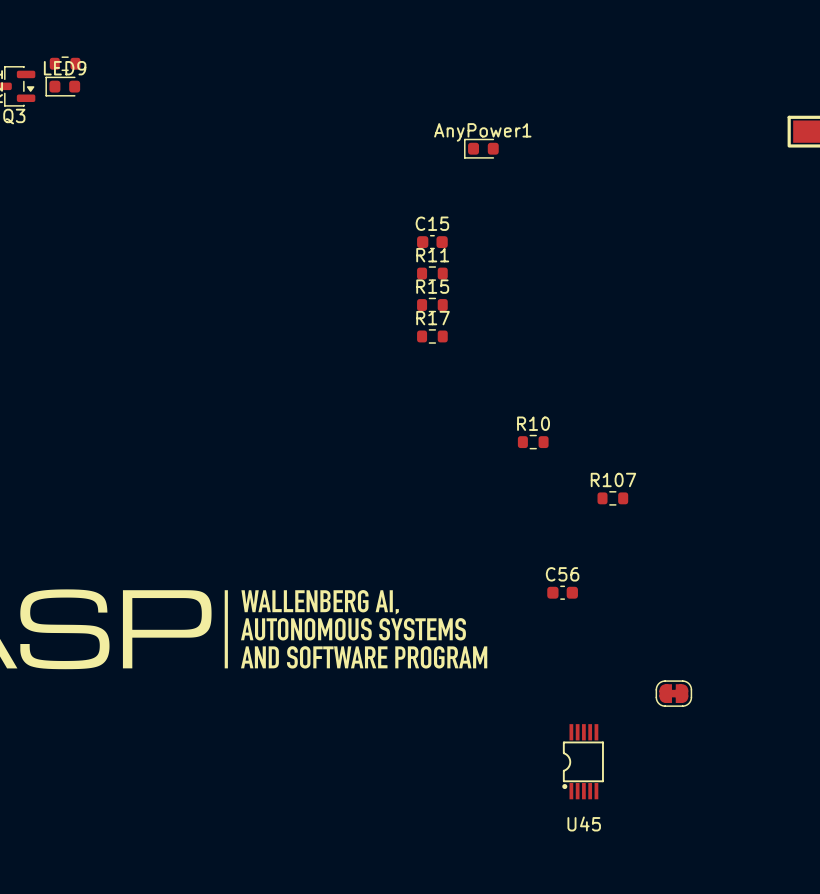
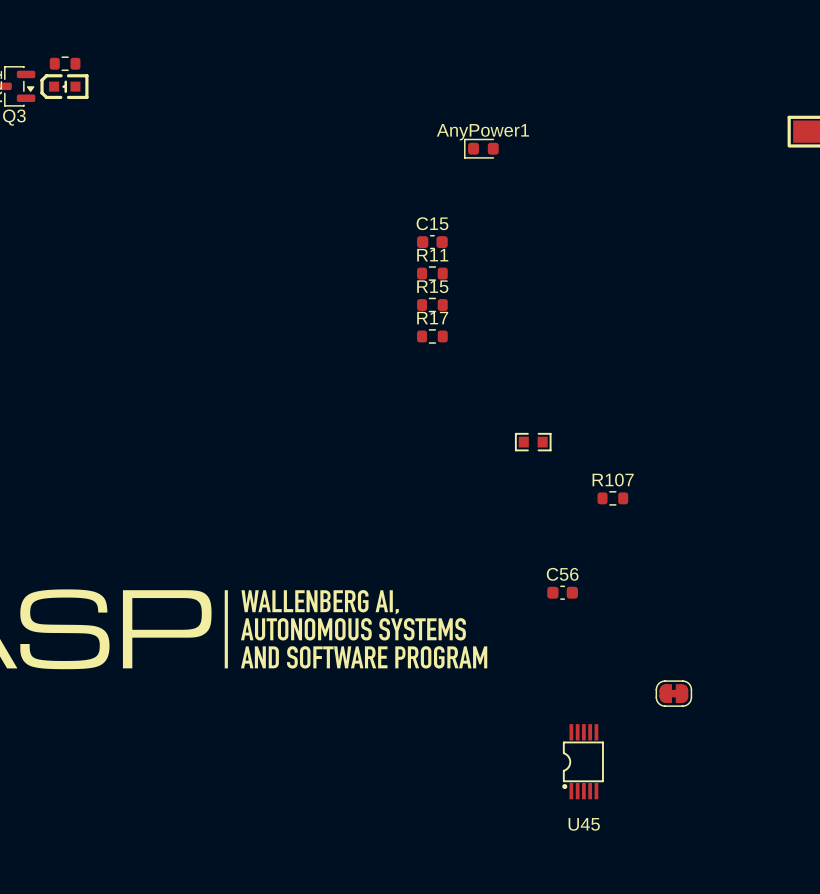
LED9: (62, 86) -> none
part: none -> (64, 86)
R10: (533, 442) -> none
part: none -> (533, 442)

